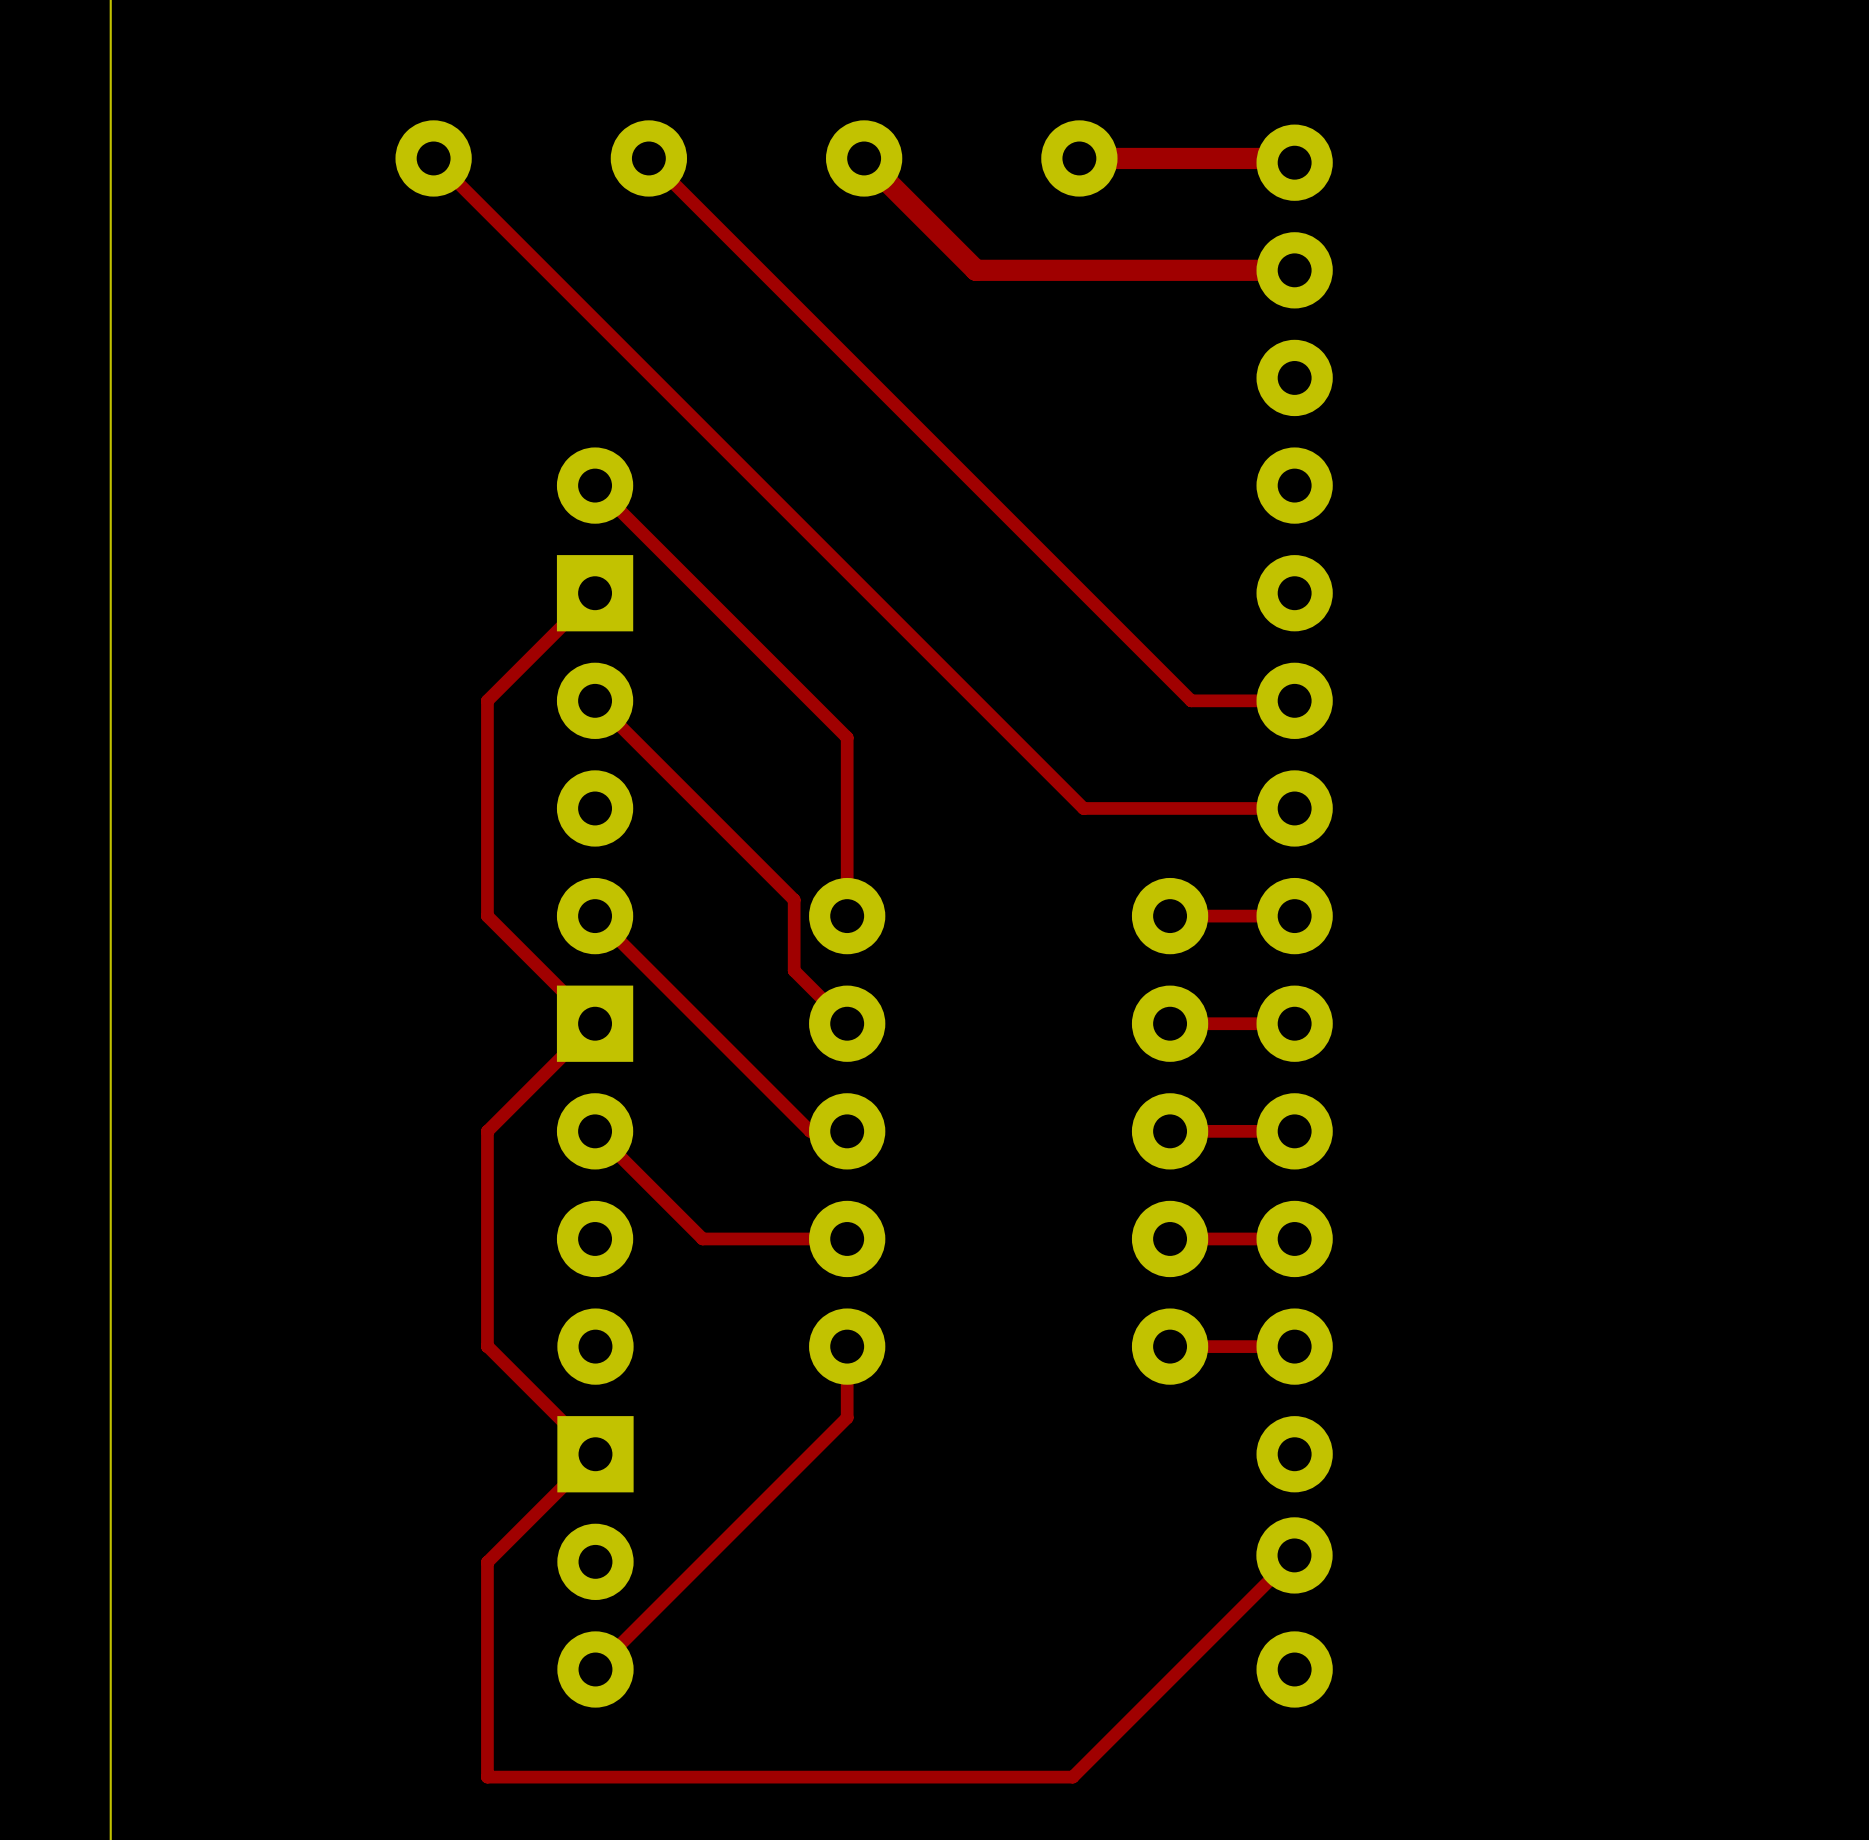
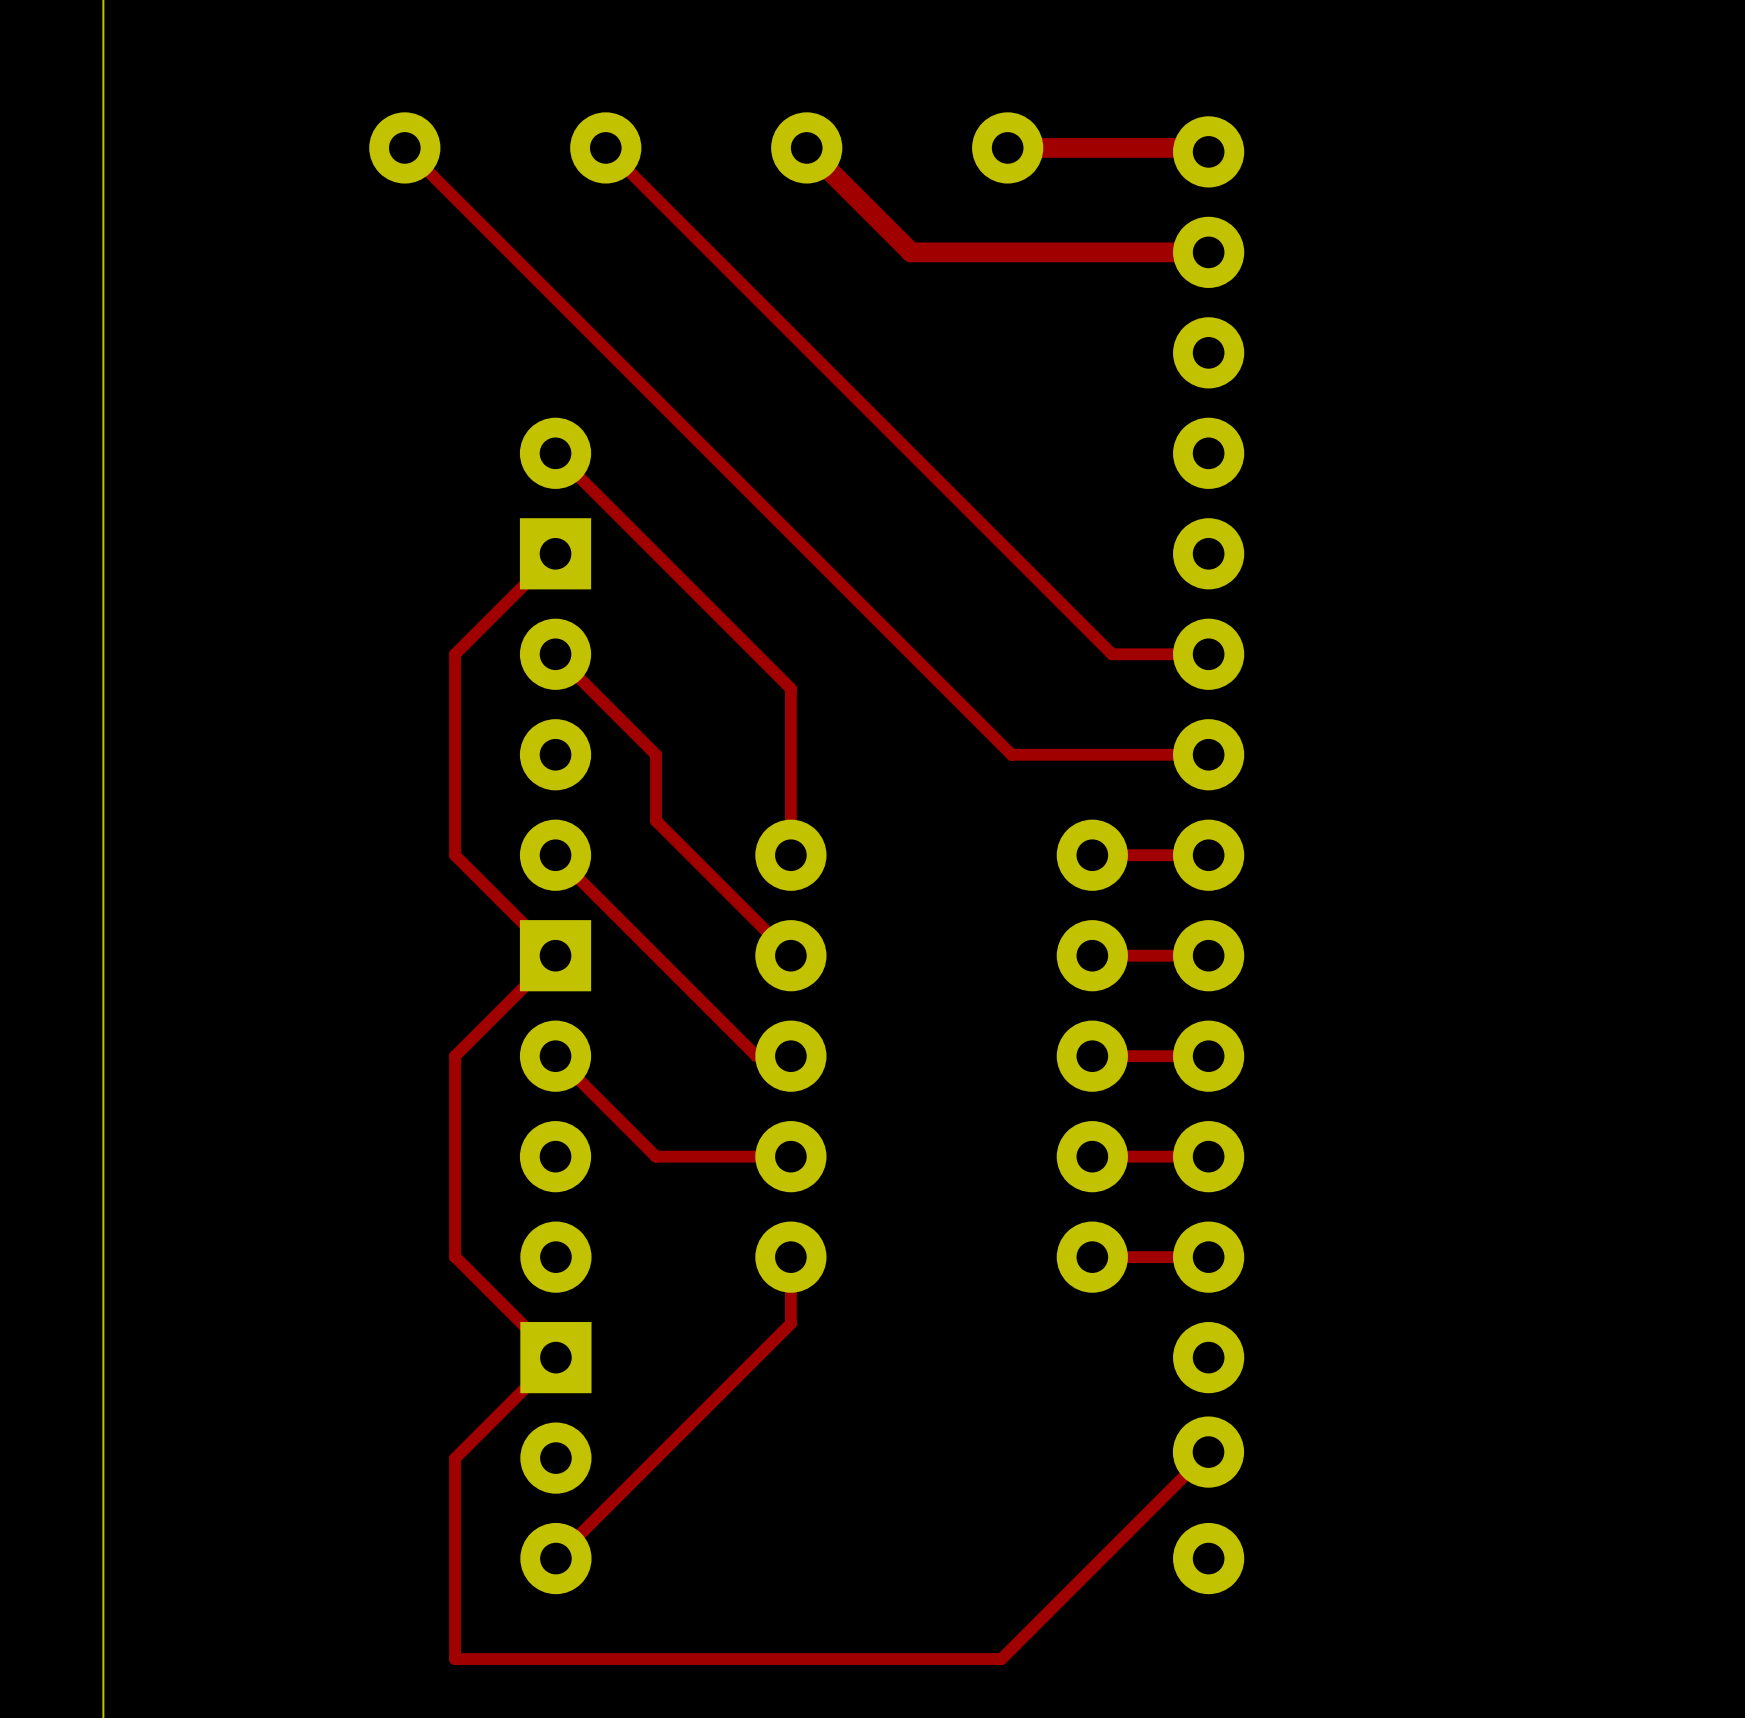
top track: (702, 808) (794, 899) (794, 970) -> (656, 754) (656, 820) (741, 906)

